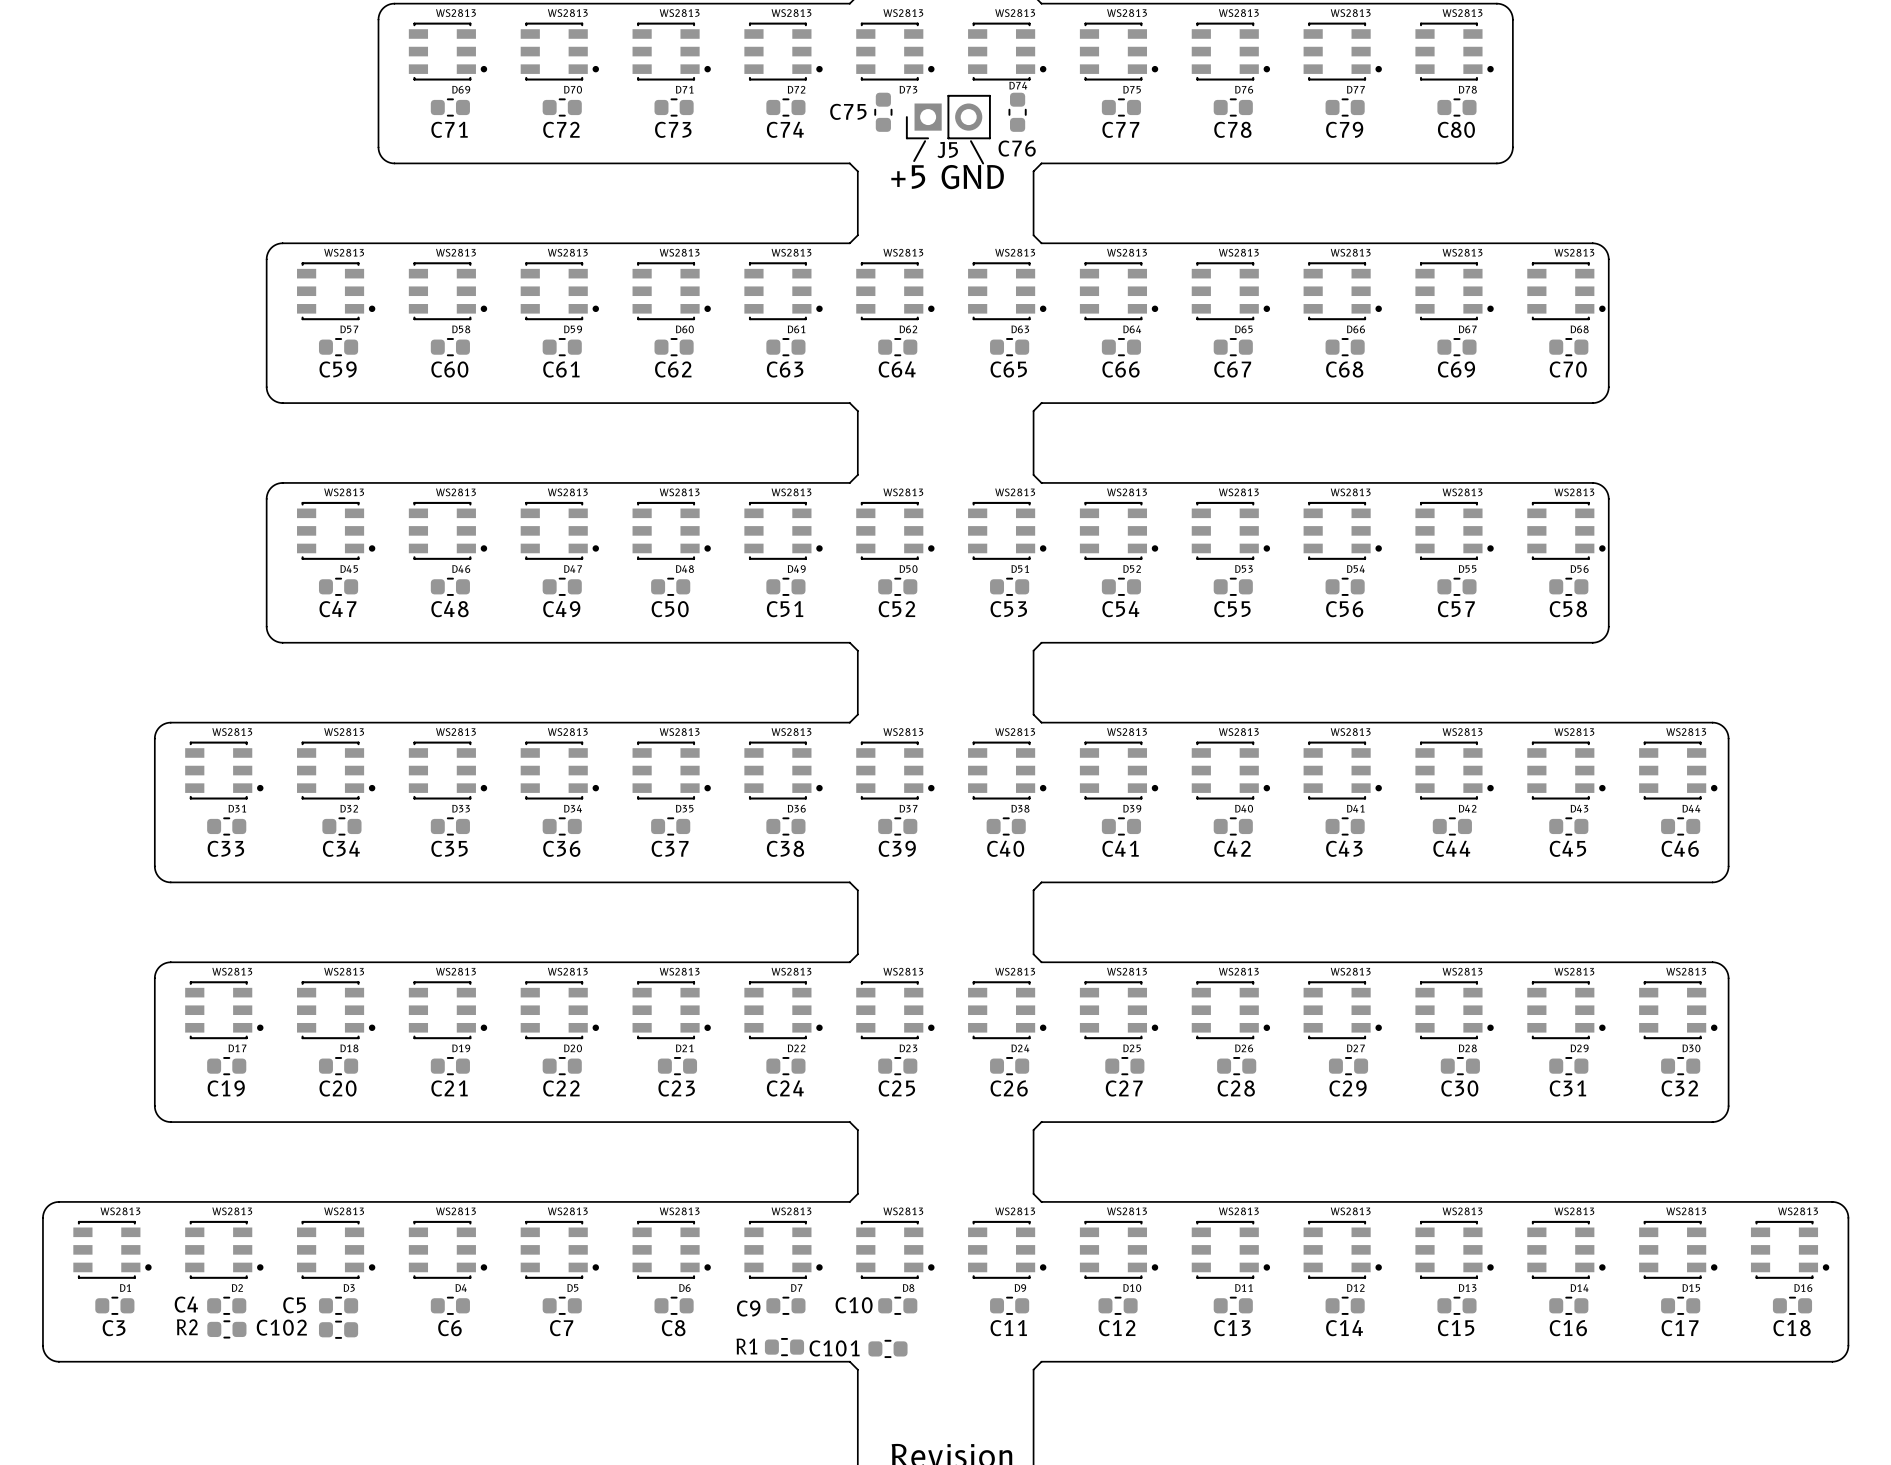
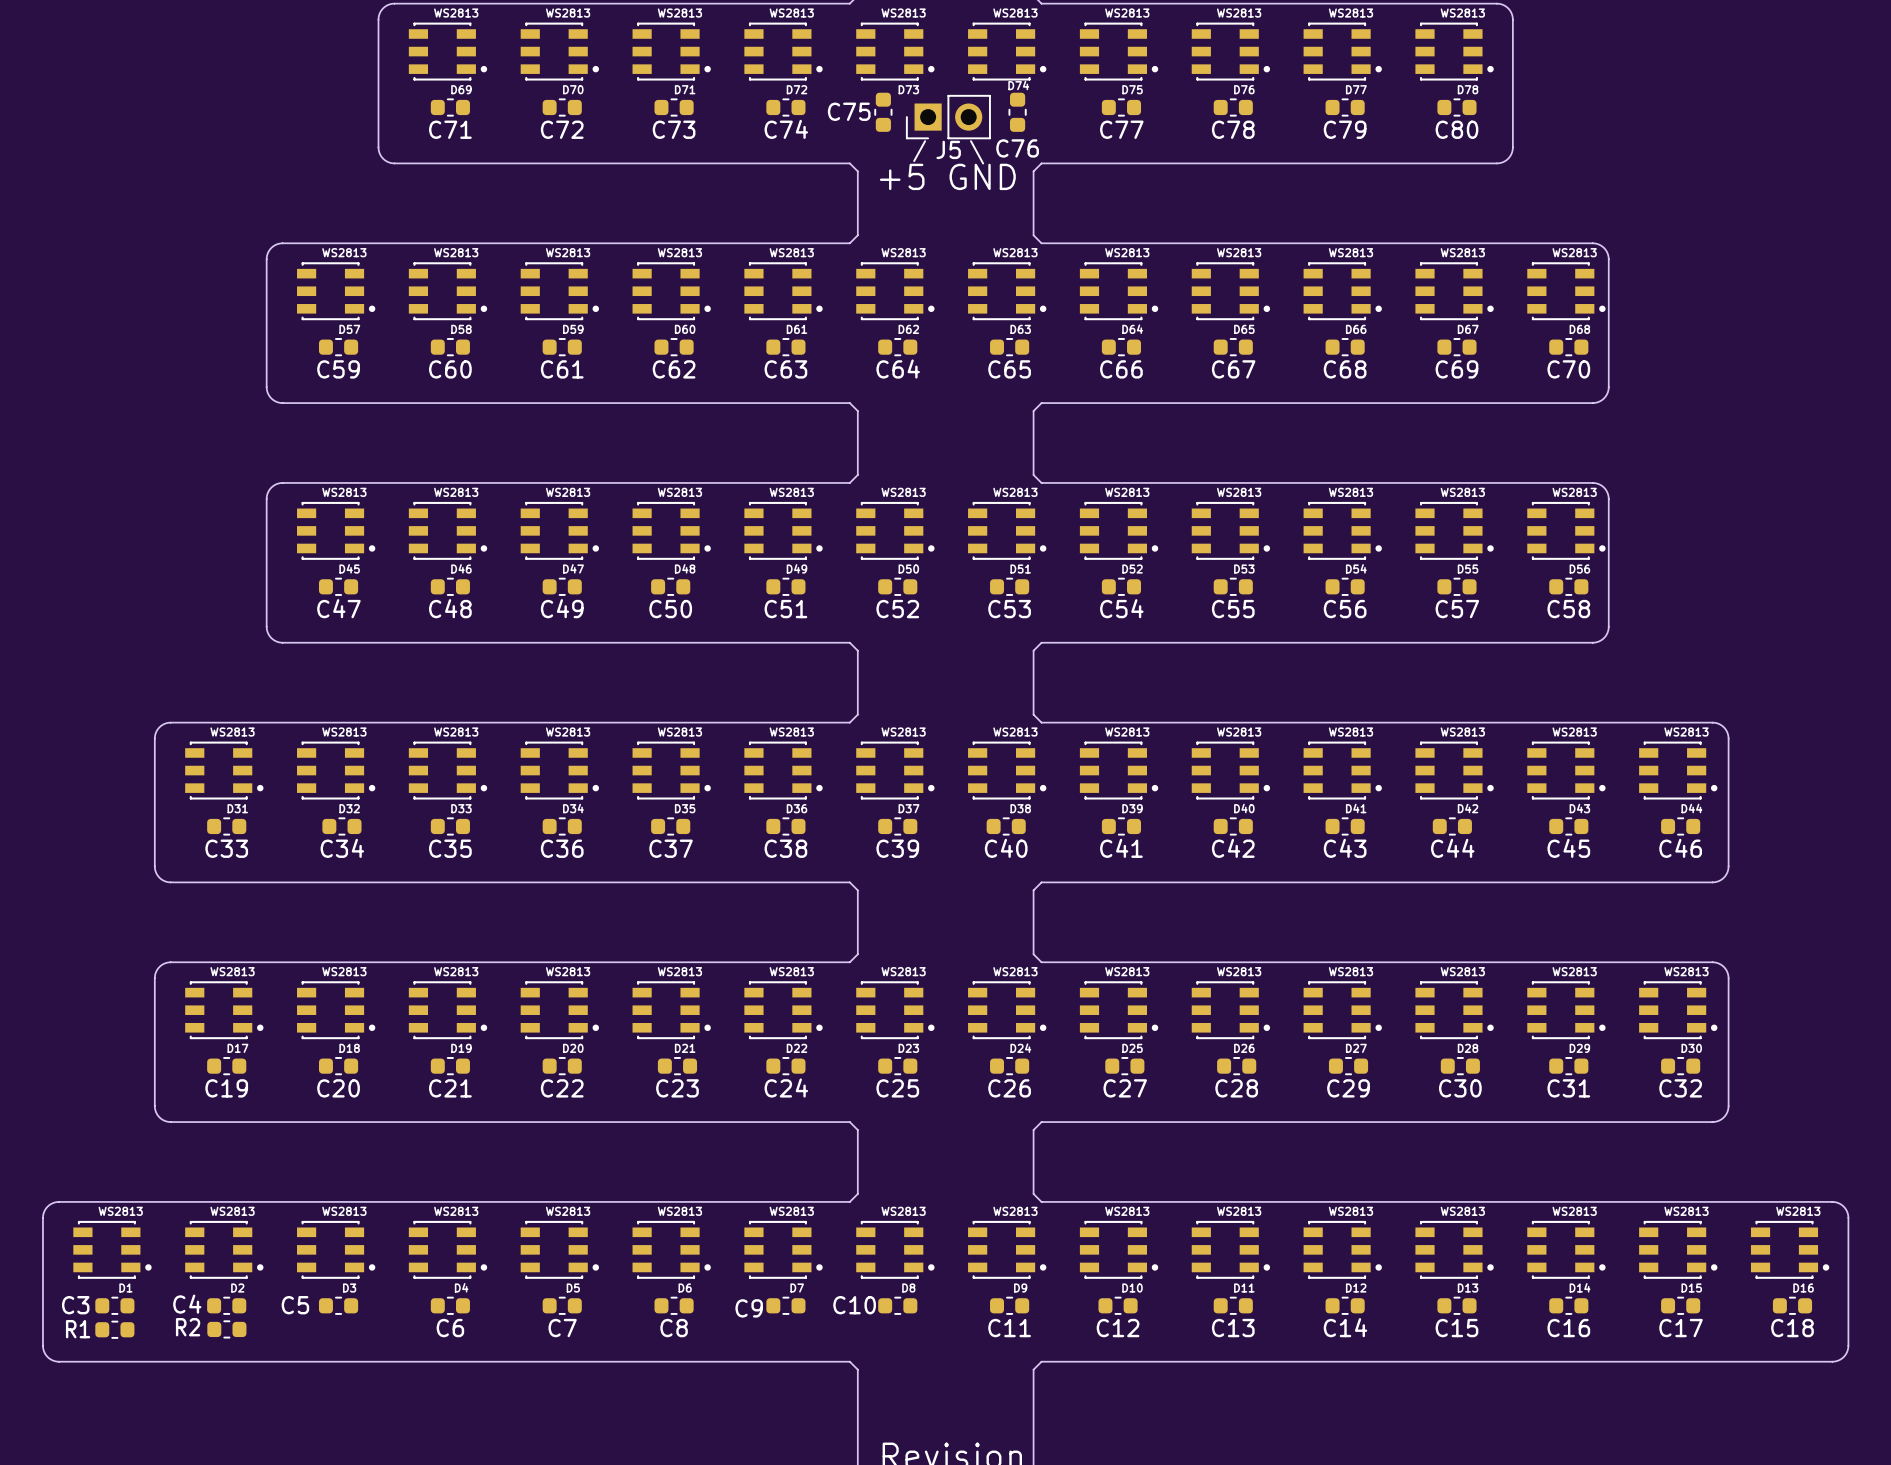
C3 name position: C3 (114, 1328) -> C3 (75, 1305)
C102: (338, 1329) -> none
R1 position: (784, 1347) -> (114, 1329)
C101: (887, 1348) -> none

